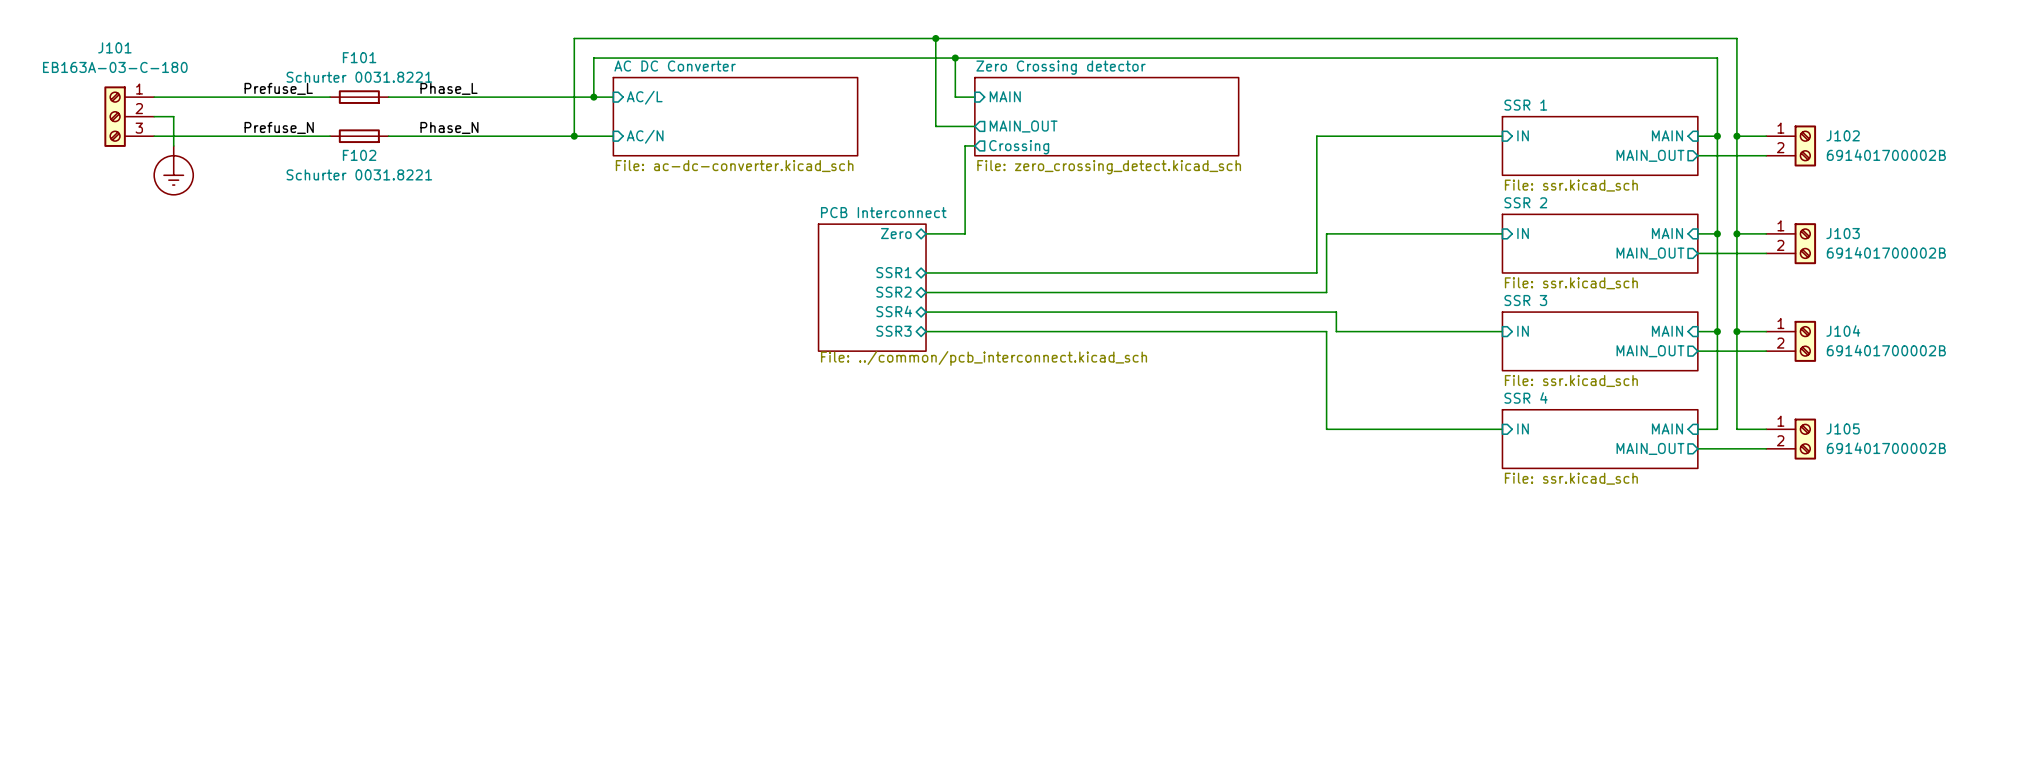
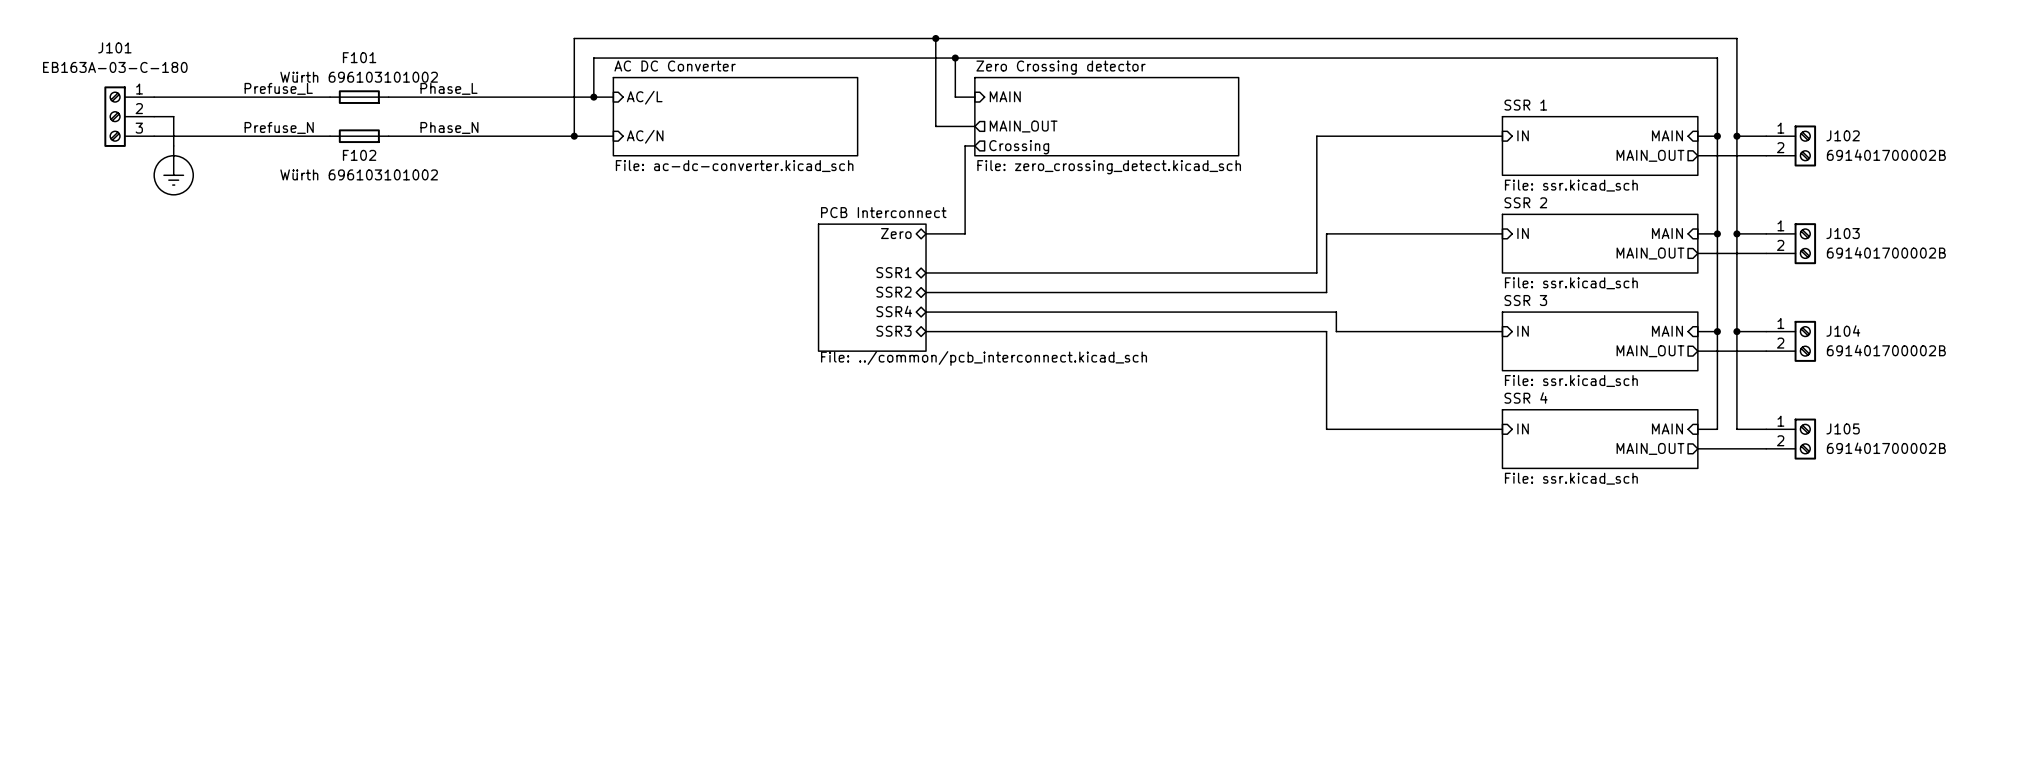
F101 value: Schurter 0031.8221 (359, 77) -> Würth 696103101002 (359, 77)
F102 value: Schurter 0031.8221 (359, 174) -> Würth 696103101002 (359, 174)

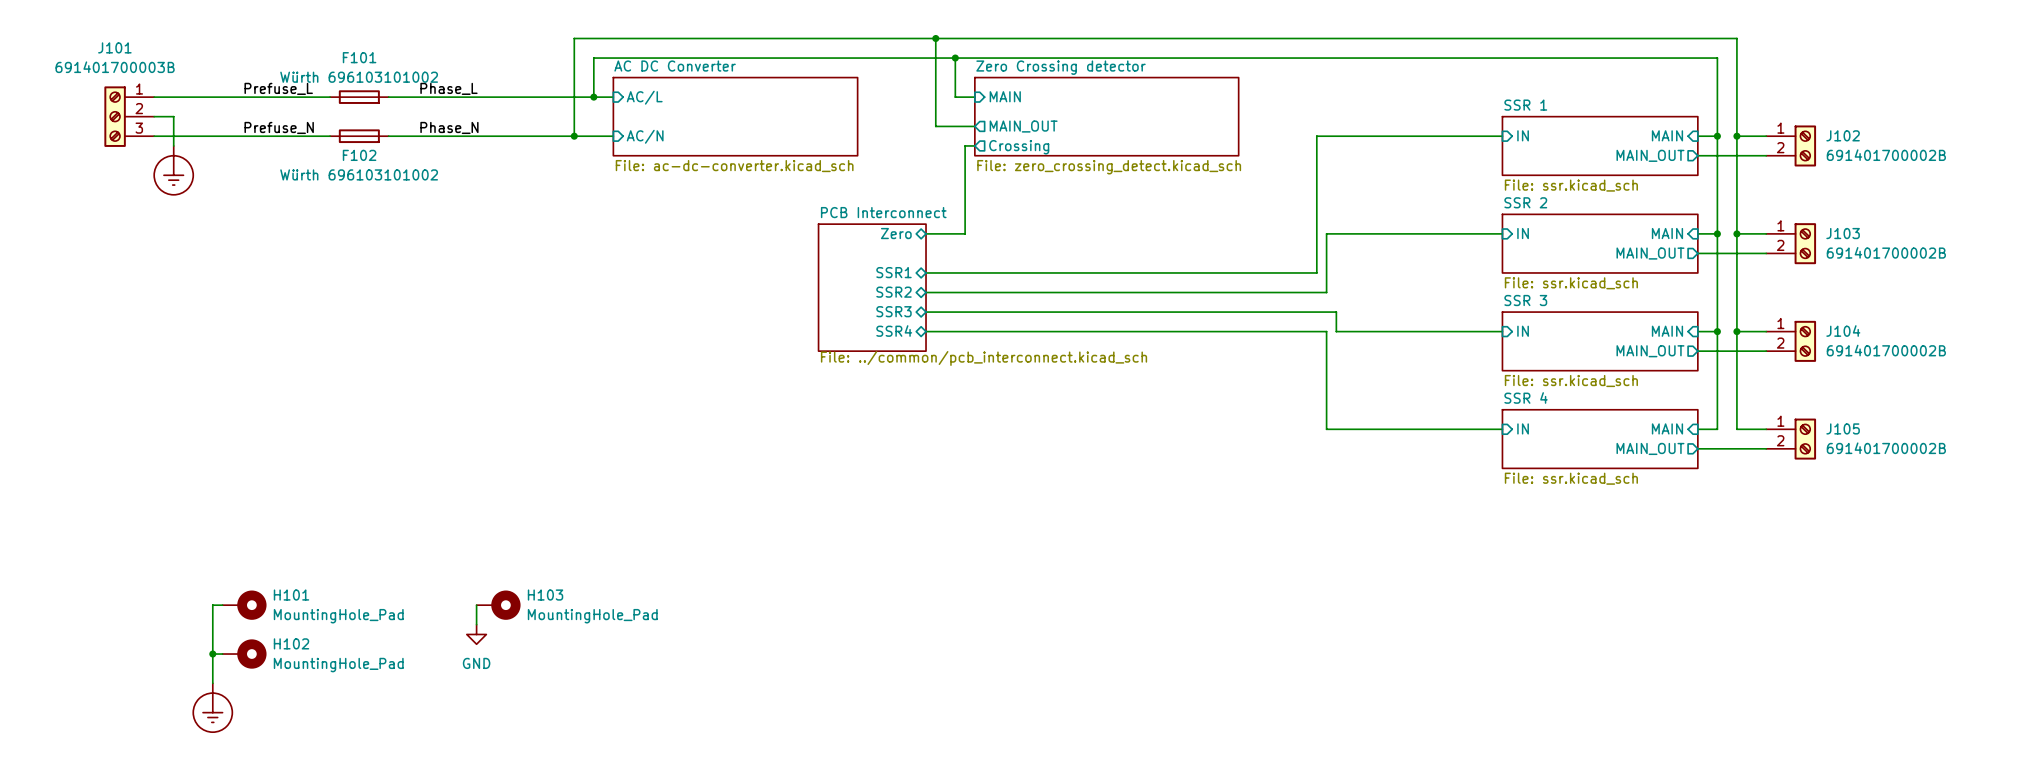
J101 value: EB163A-03-C-180 (115, 67) -> 691401700003B (115, 67)
sheet pin: SSR4 (894, 311) -> SSR3 (893, 311)
sheet pin: SSR3 (893, 331) -> SSR4 (894, 331)
wire: none -> (222, 605) (212, 605) (212, 683)
H101: none -> MountingHole_Pad (244, 605)
wire: none -> (476, 605) (476, 624)
H103: none -> MountingHole_Pad (498, 605)
power symbol: none -> GND (476, 634)
wire: none -> (212, 654) (222, 654)
junction: none -> (212, 654)
H102: none -> MountingHole_Pad (244, 654)
power symbol: none -> (212, 707)

